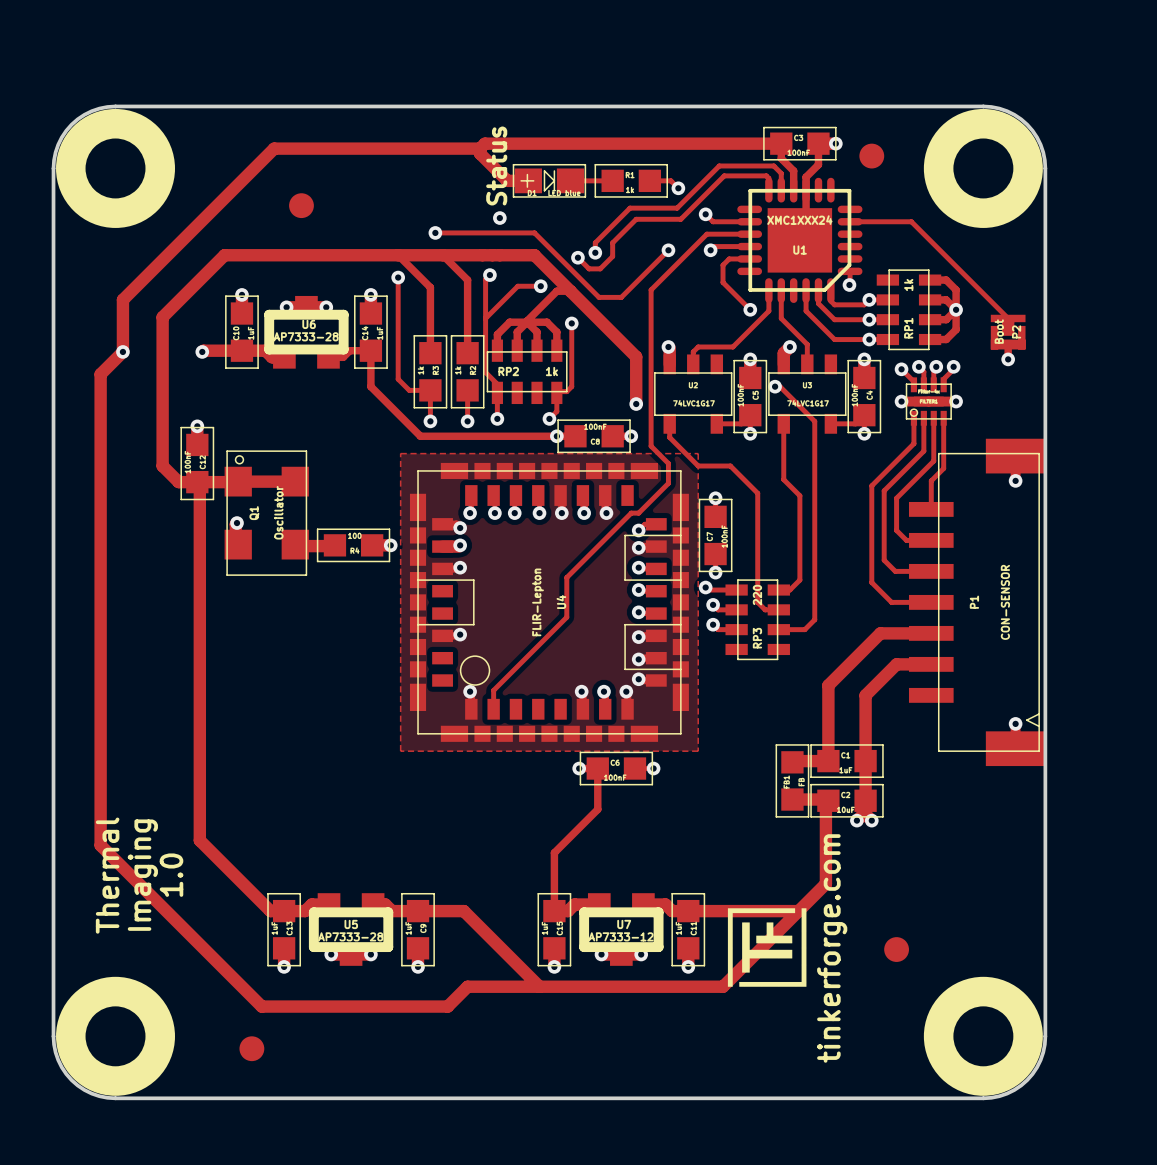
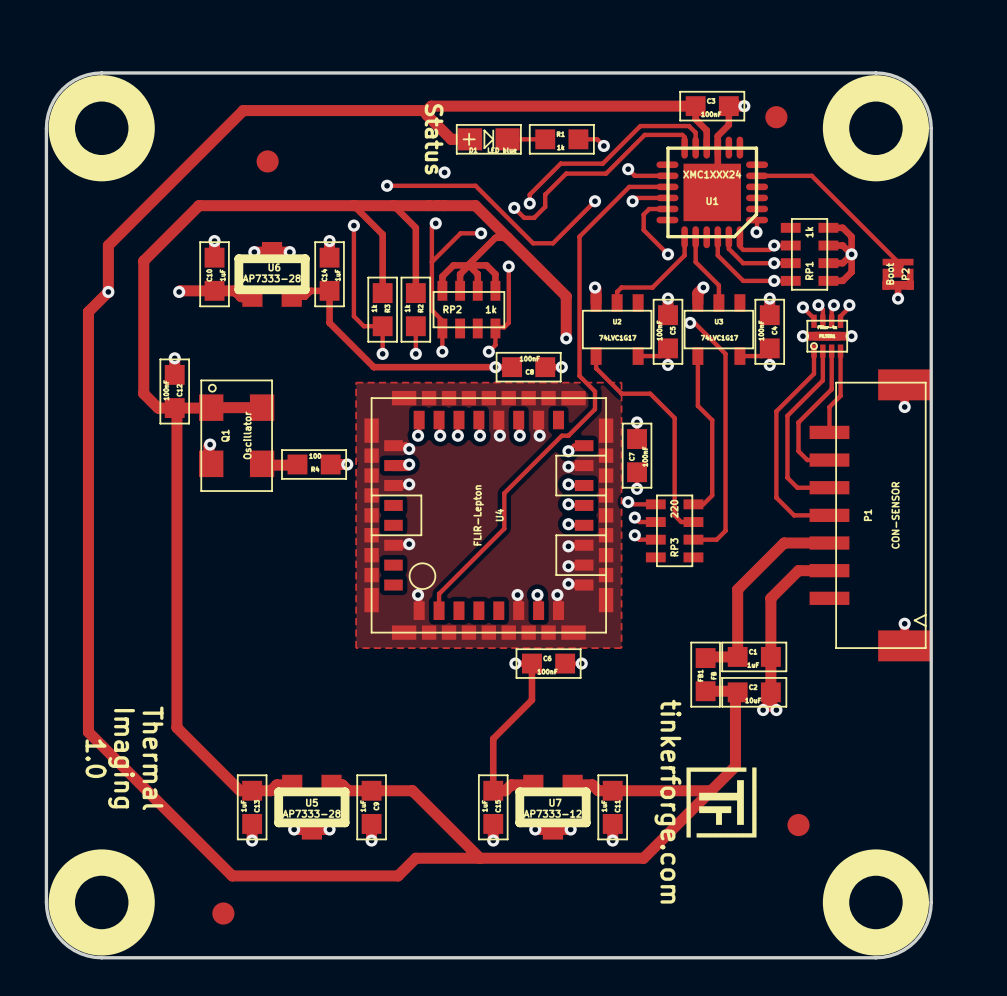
text rotation: 0° (496, 165) -> 180° (434, 139)
text: Thermal (107, 875) -> 1.0 (96, 758)
text rotation: 0° (142, 875) -> 180° (121, 758)
text: 1.0 (171, 875) -> Thermal (153, 758)
drawing: none -> [686, 767, 757, 838]
drawing: [727, 908, 807, 987] -> none
text rotation: 0° (832, 948) -> 180° (667, 801)

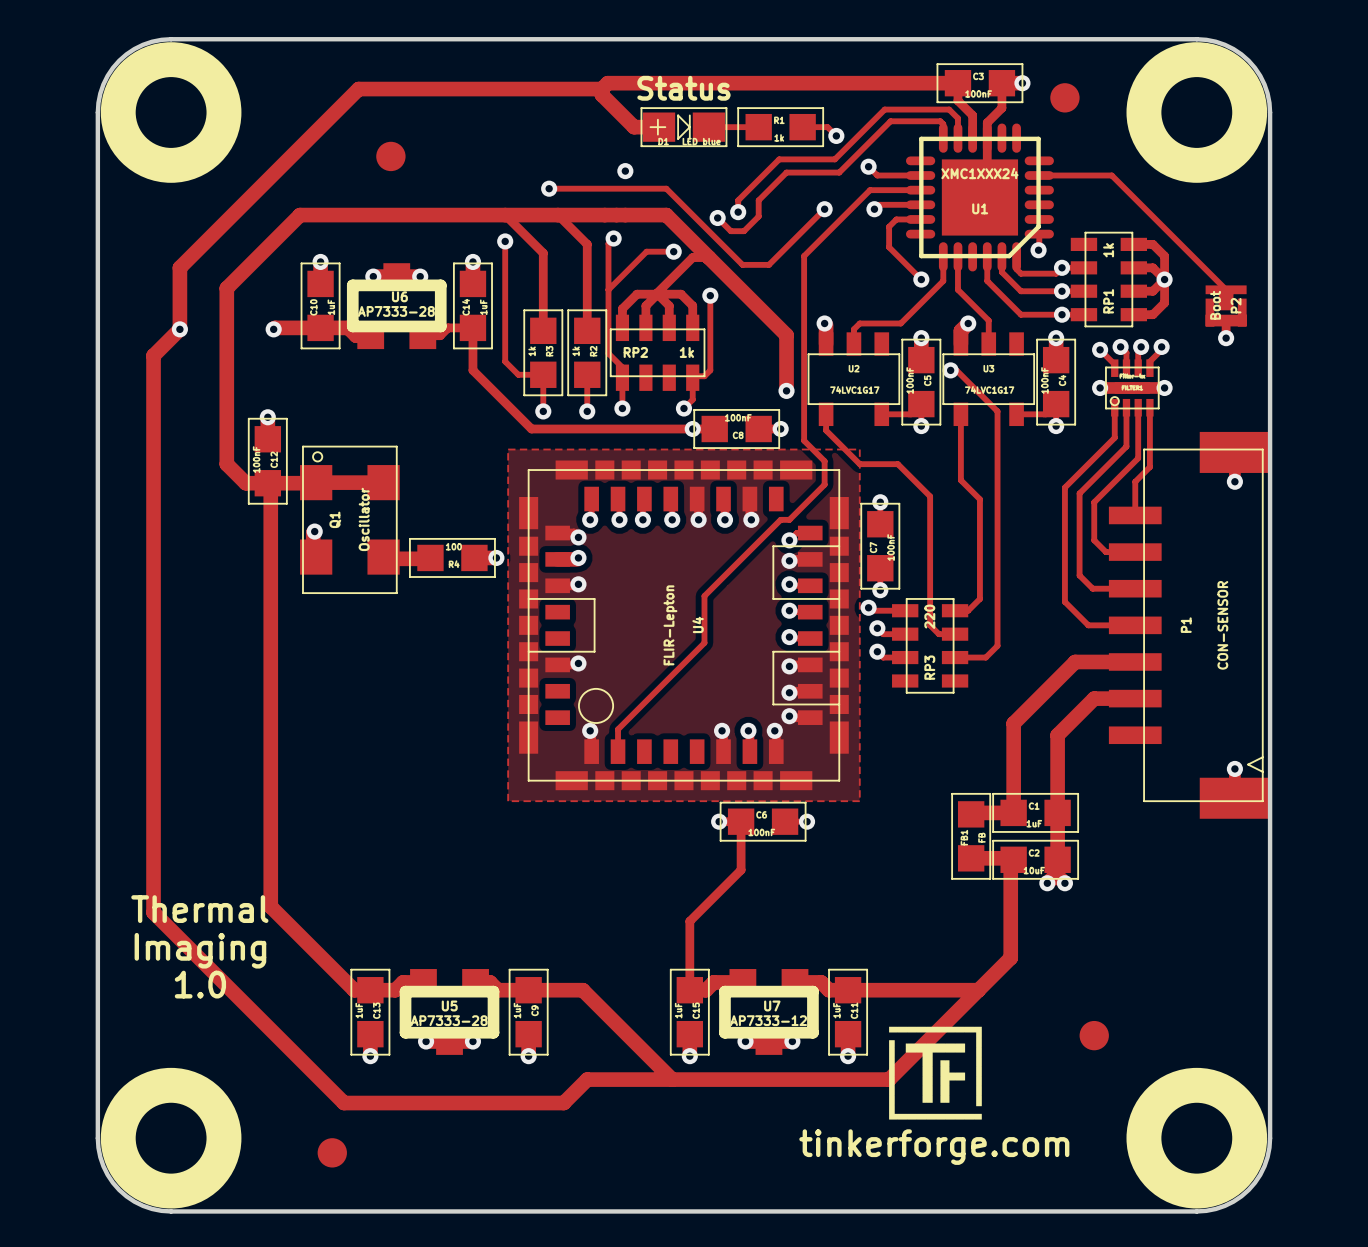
text rotation: 0° (434, 139) -> 90° counterclockwise (683, 88)
text rotation: 0° (96, 758) -> 90° counterclockwise (200, 984)
text rotation: 0° (121, 758) -> 90° counterclockwise (200, 950)
text rotation: 0° (153, 758) -> 90° counterclockwise (199, 909)
drawing: [686, 767, 757, 838] -> none
text rotation: 0° (667, 801) -> 90° counterclockwise (934, 1147)
drawing: none -> [889, 1026, 982, 1120]

